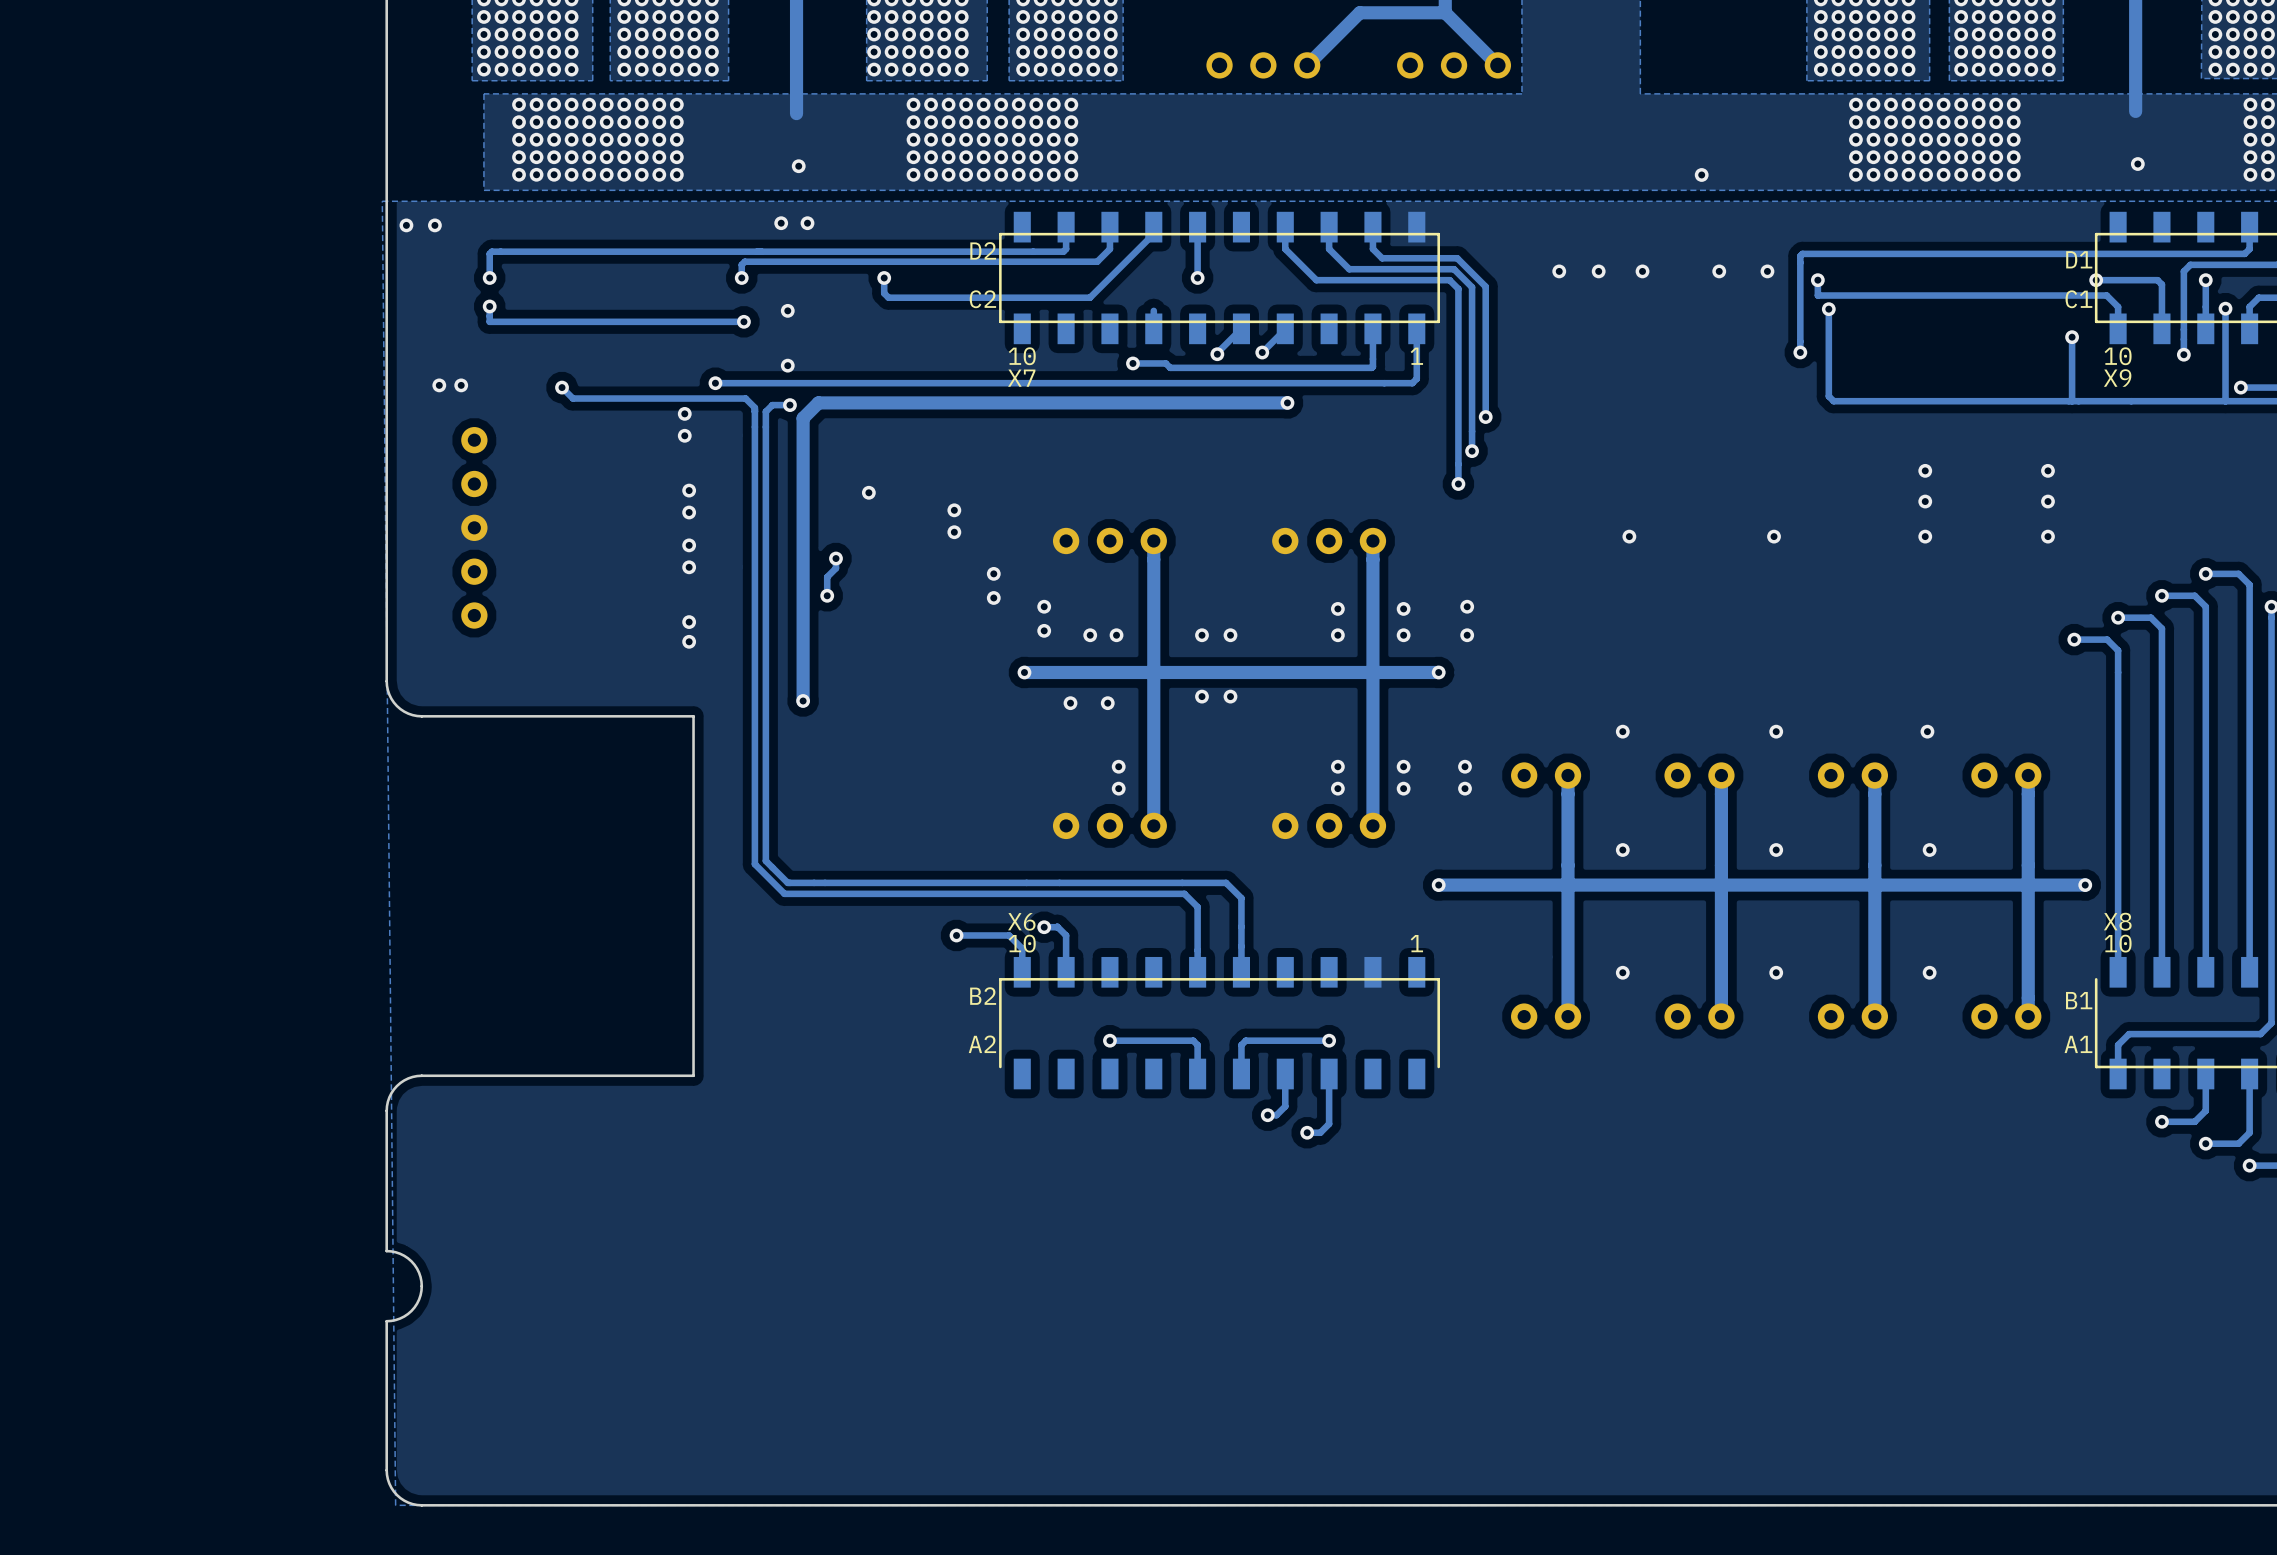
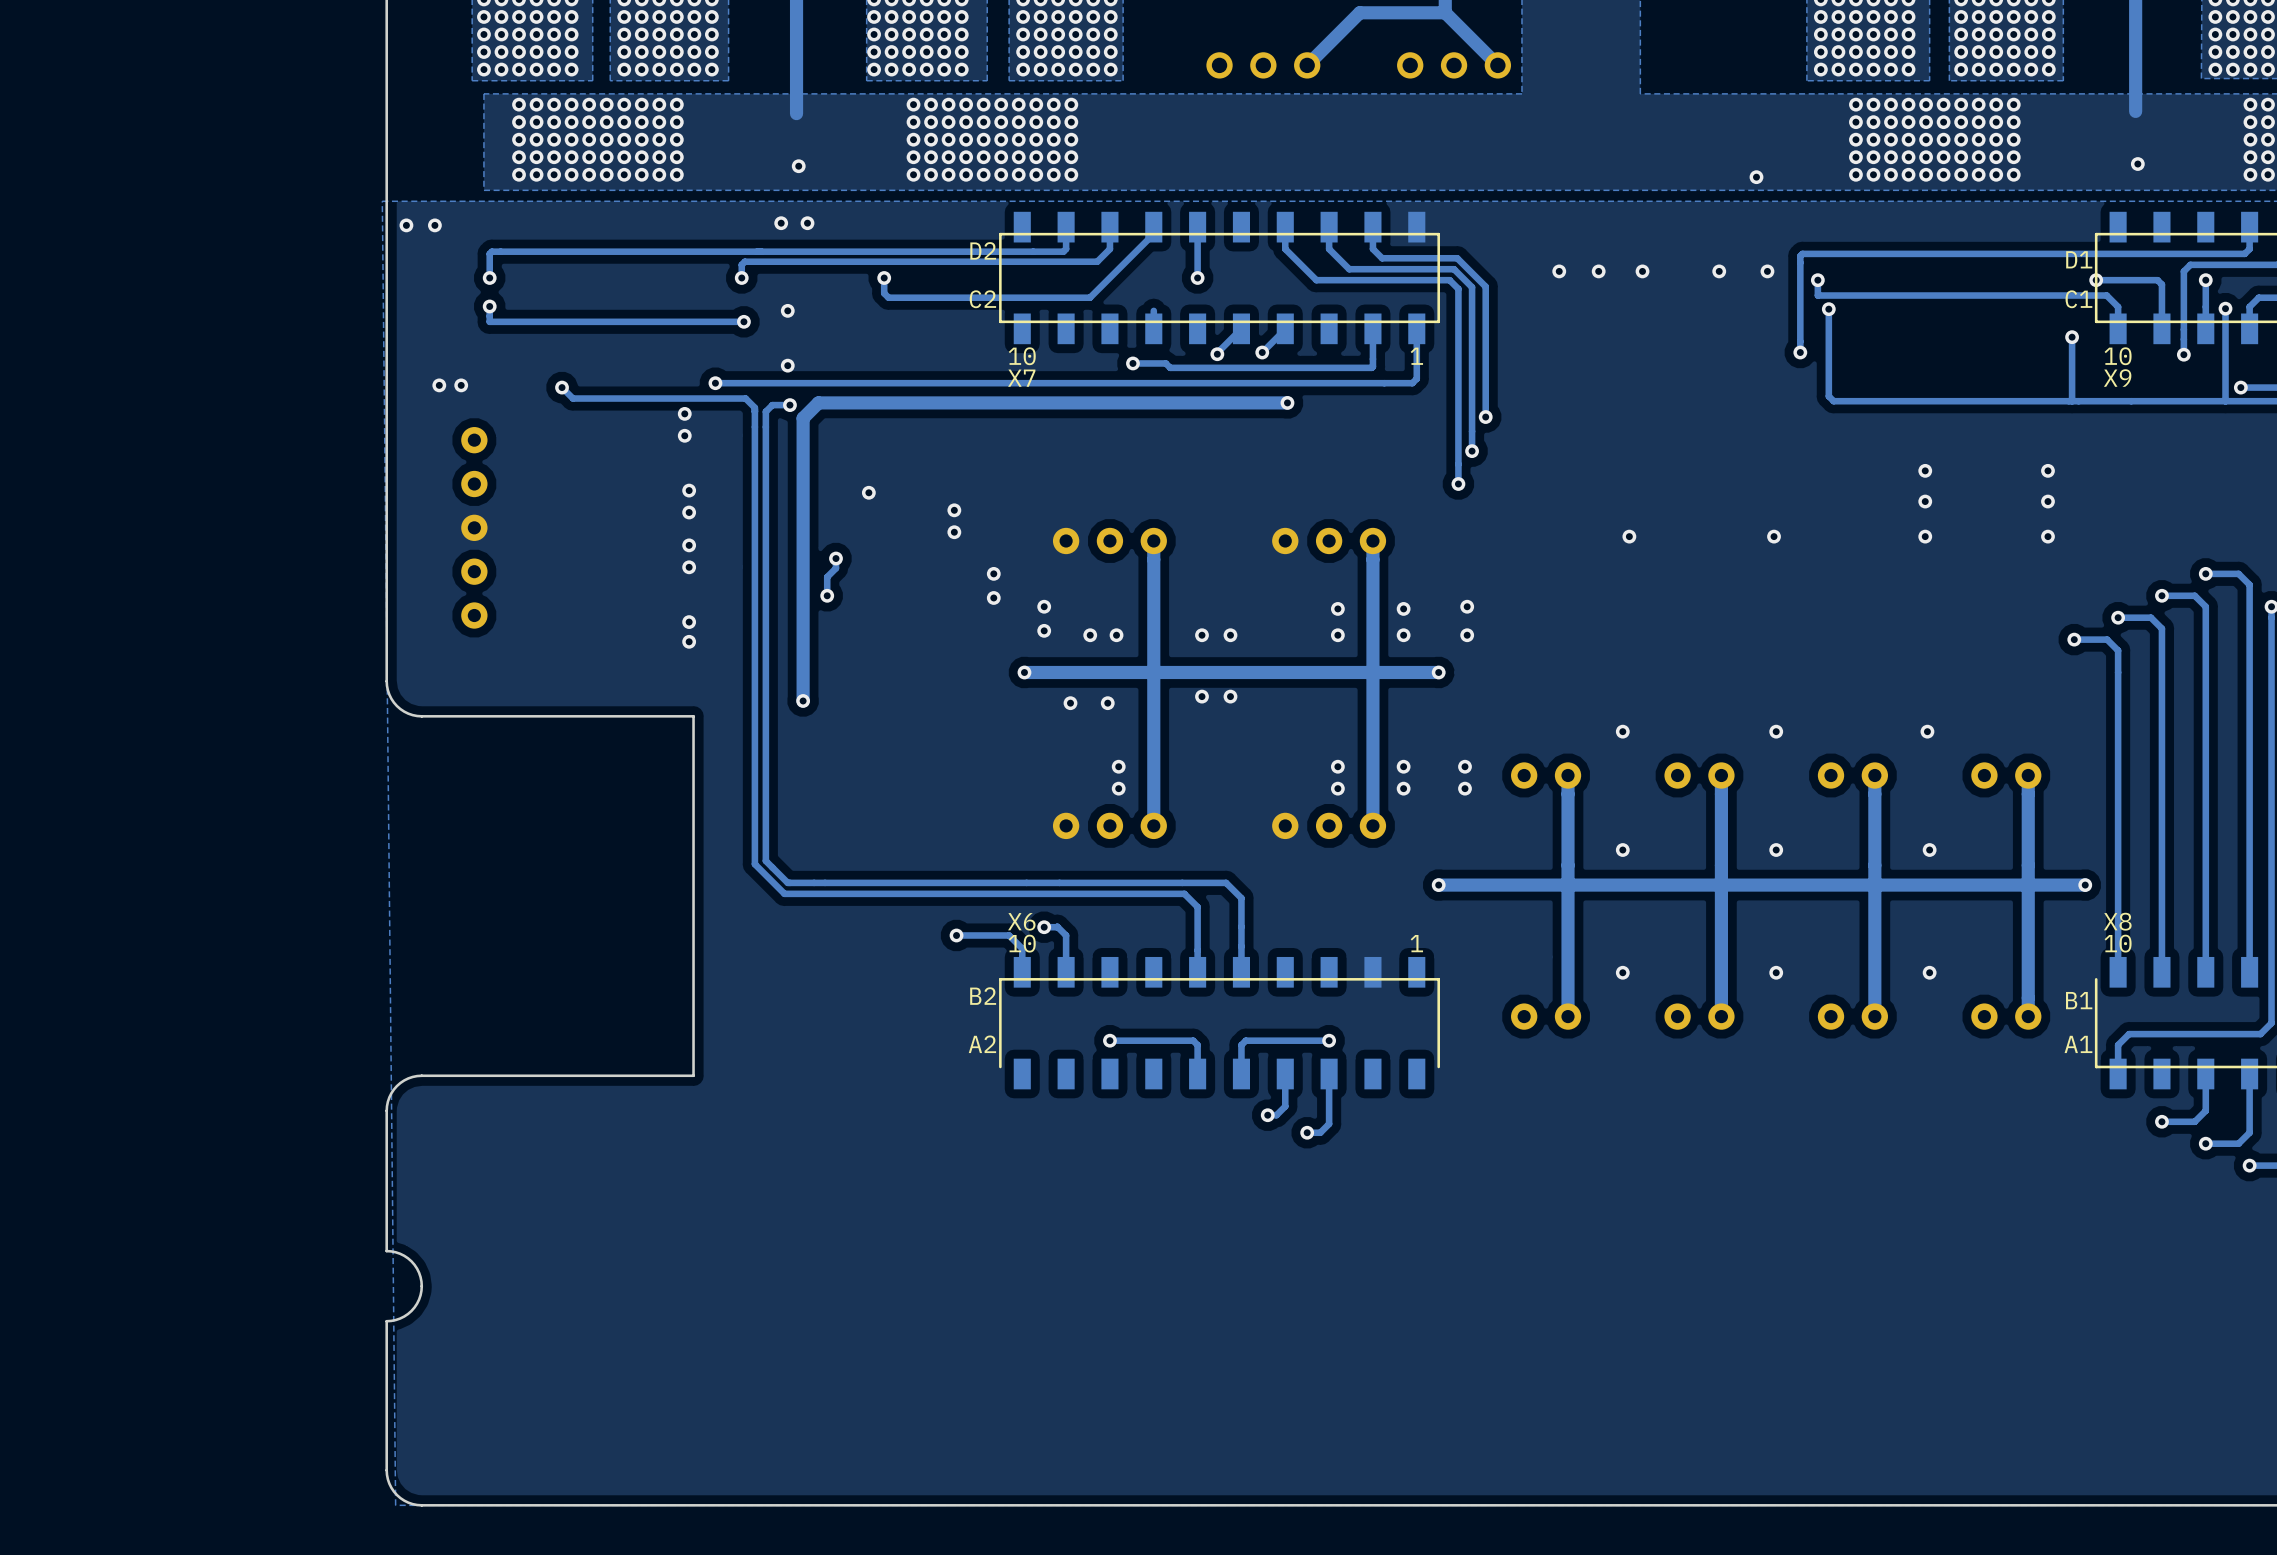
via position: (1701, 174) -> (1756, 177)

